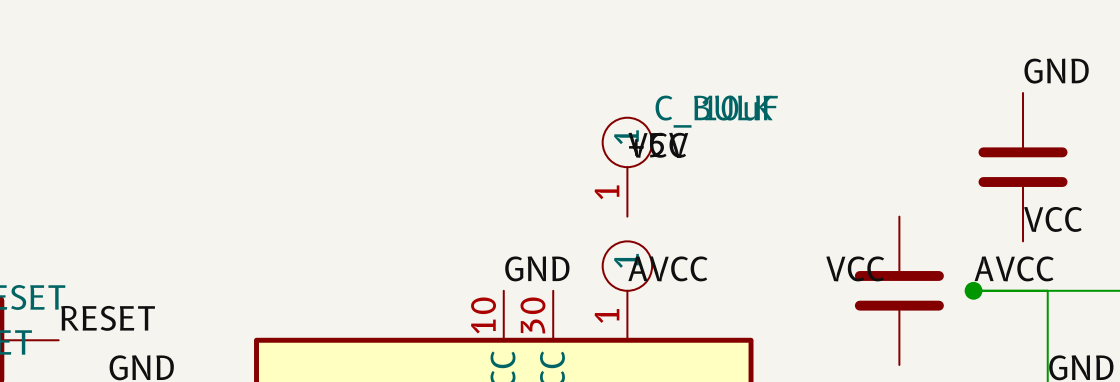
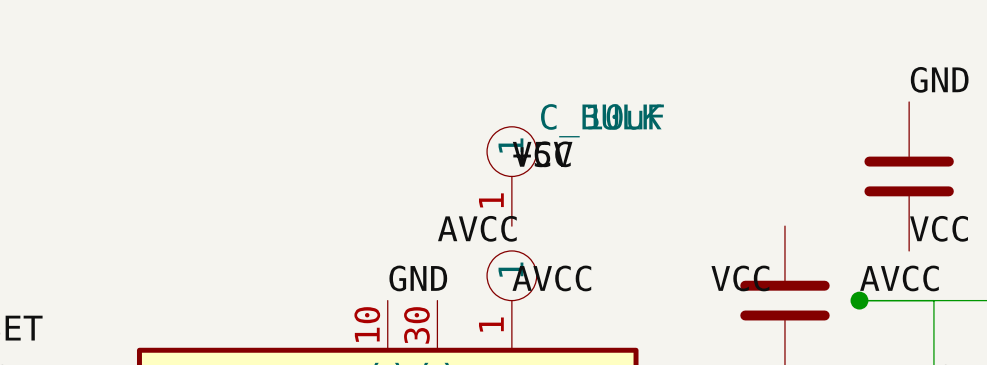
label: none -> AVCC (477, 228)

